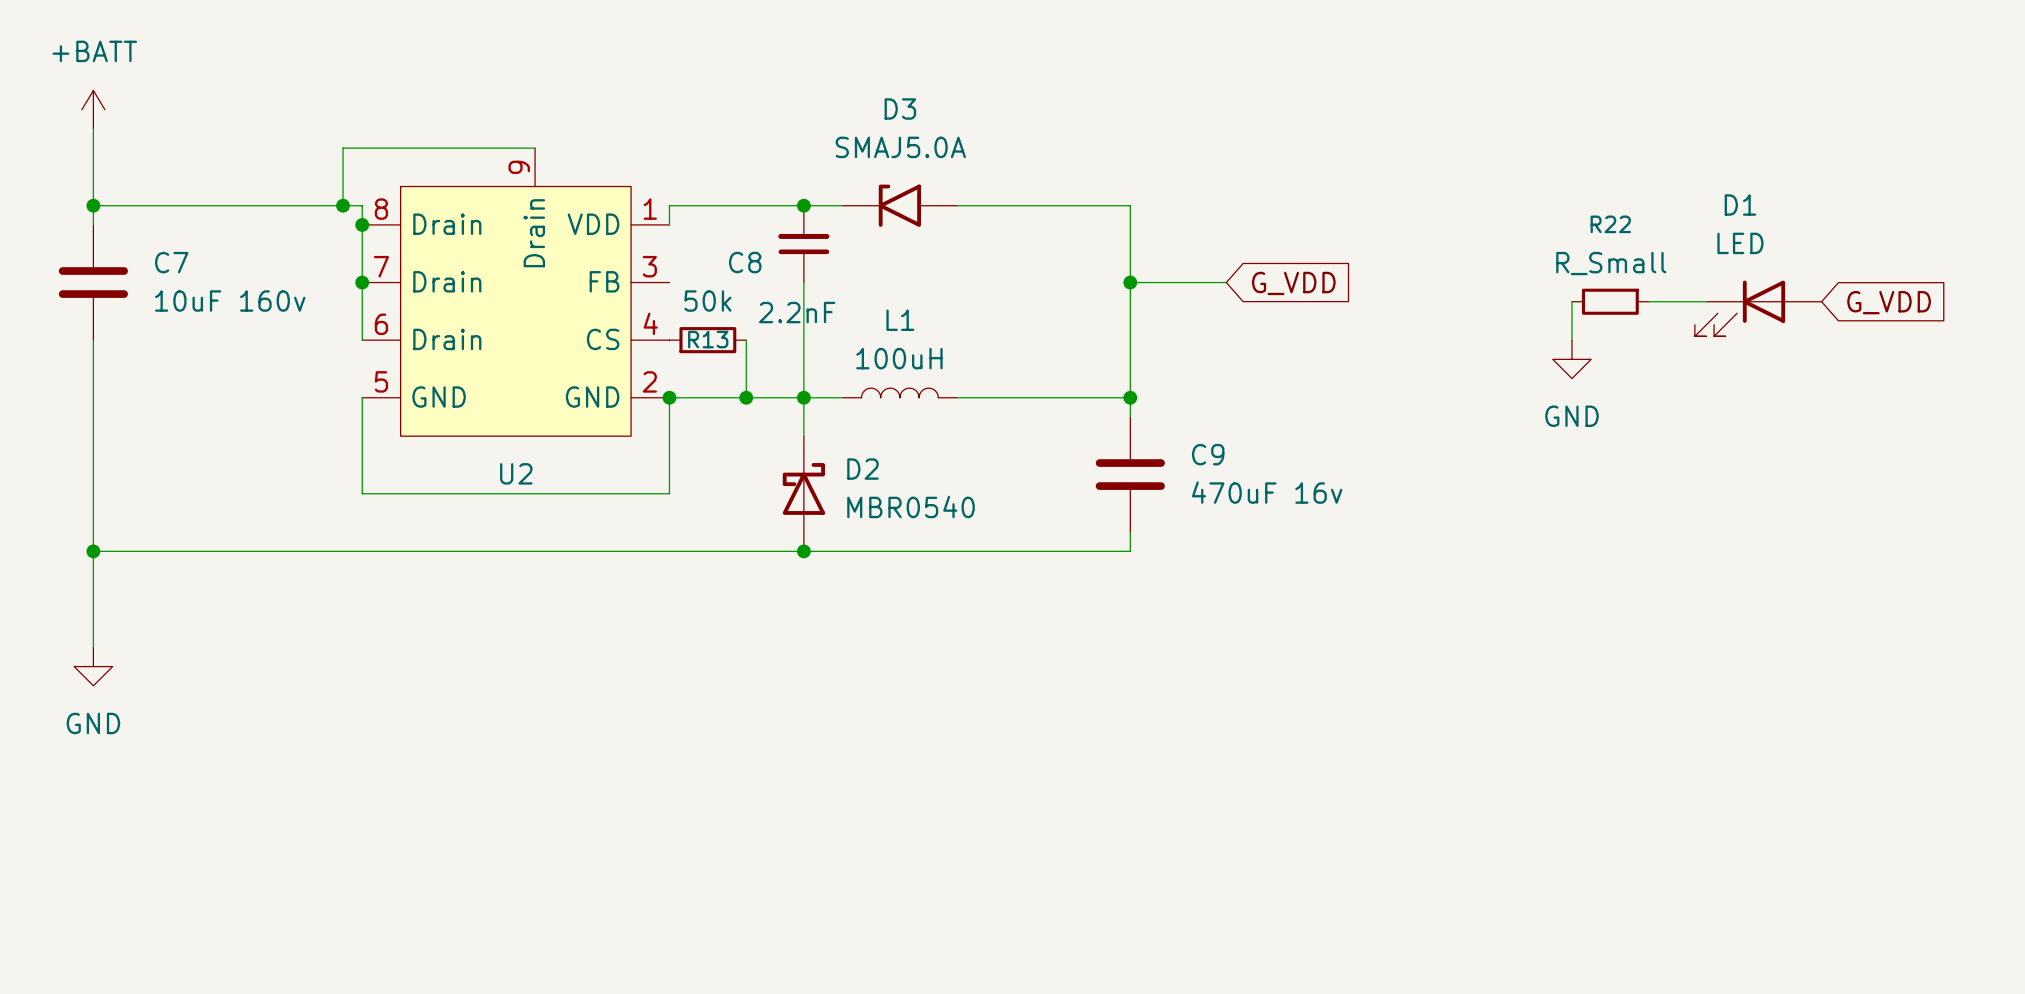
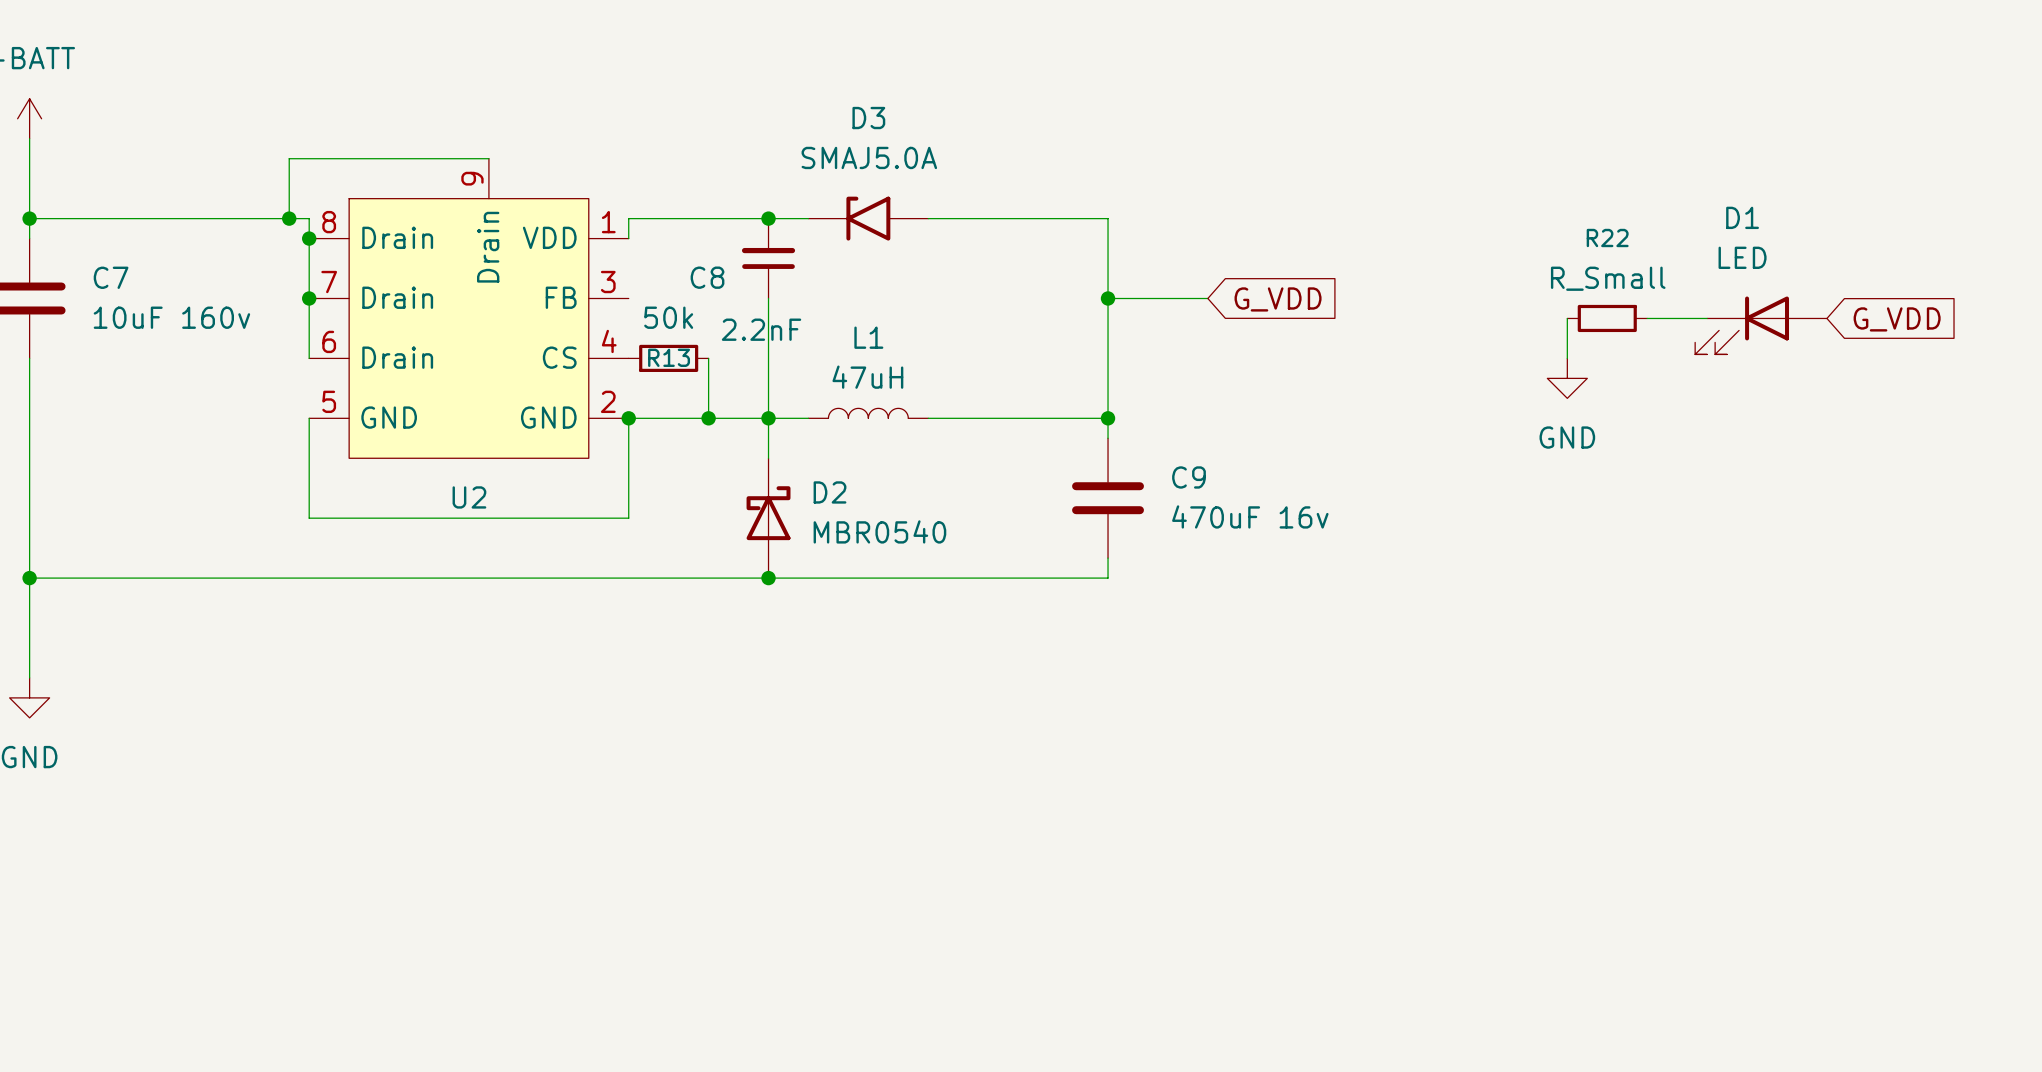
L1 value: 100uH (899, 358) -> 47uH (867, 377)

